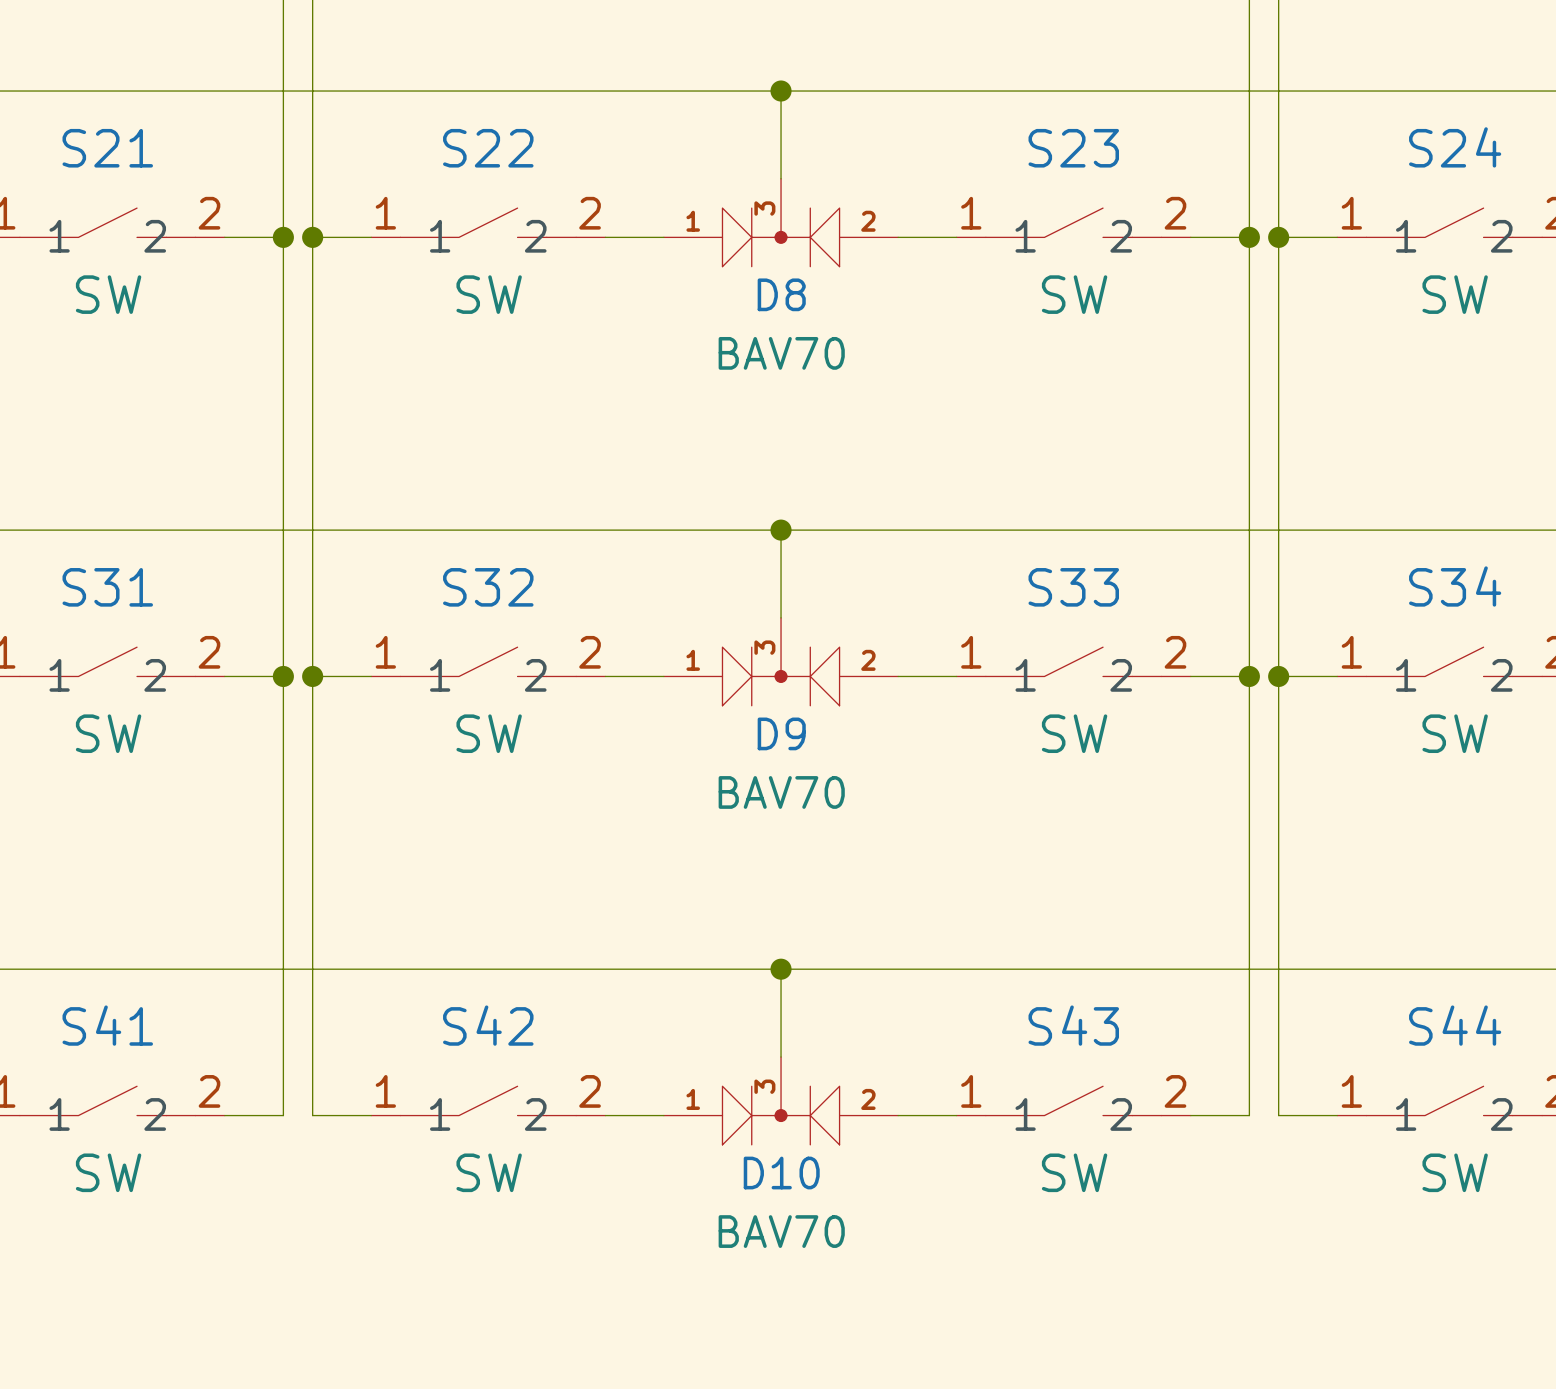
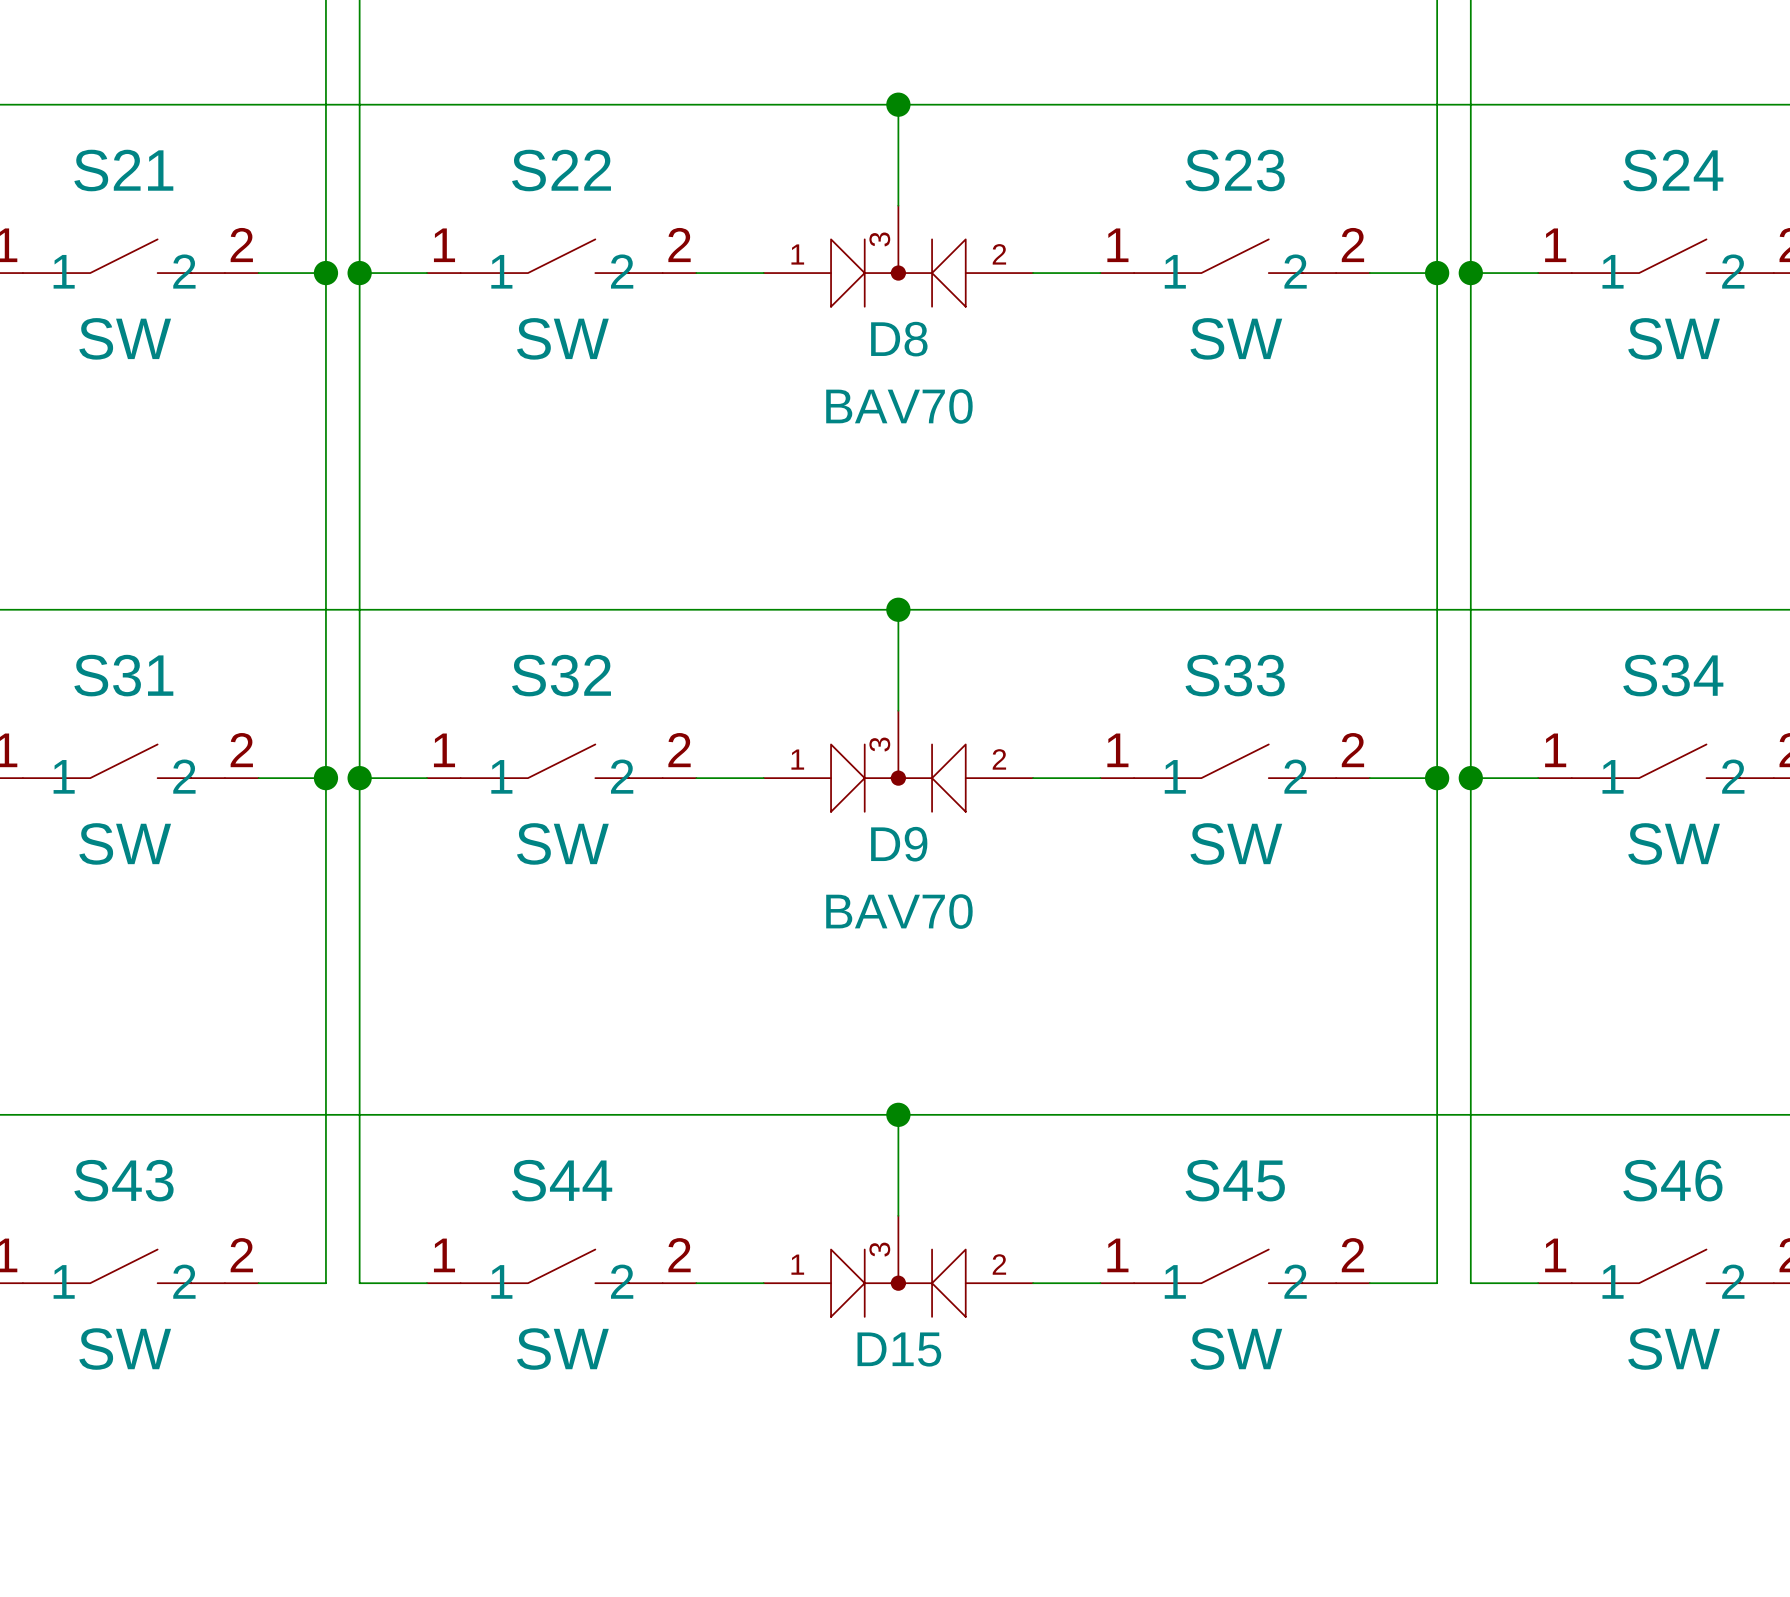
S41 name: S41 (107, 1025) -> S43 (123, 1180)
S42 name: S42 (488, 1025) -> S44 (562, 1180)
S43 name: S43 (1073, 1025) -> S45 (1235, 1180)
S44 name: S44 (1455, 1025) -> S46 (1672, 1180)
D10 name: D10 (781, 1173) -> D15 (899, 1349)
D10 value: BAV70 (781, 1231) -> none

